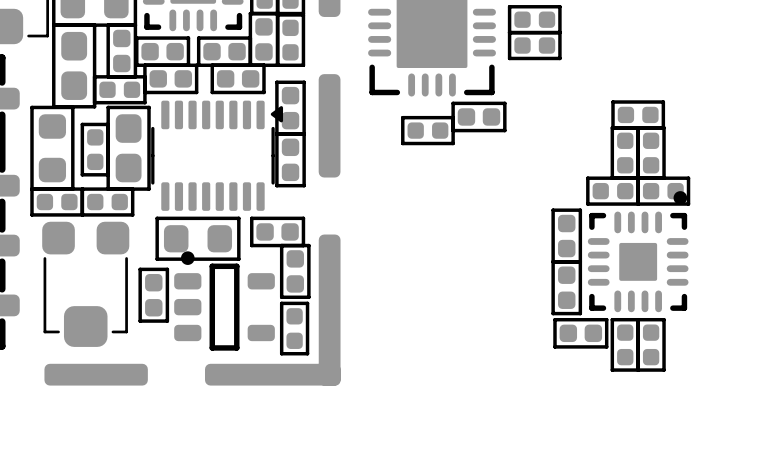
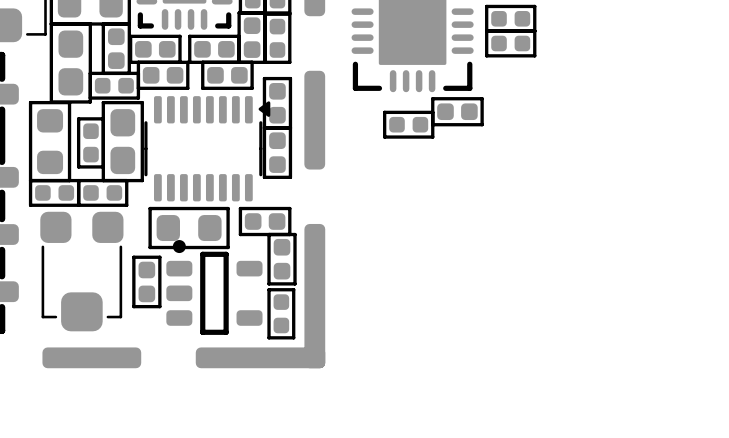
part: (638, 114) -> none
part: (625, 153) -> none
part: (651, 153) -> none
part: (613, 191) -> none
part: (663, 191) -> none
part: (566, 236) -> none
part: (638, 251) -> none
part: (566, 287) -> none
part: (580, 333) -> none
part: (625, 344) -> none
part: (651, 344) -> none

